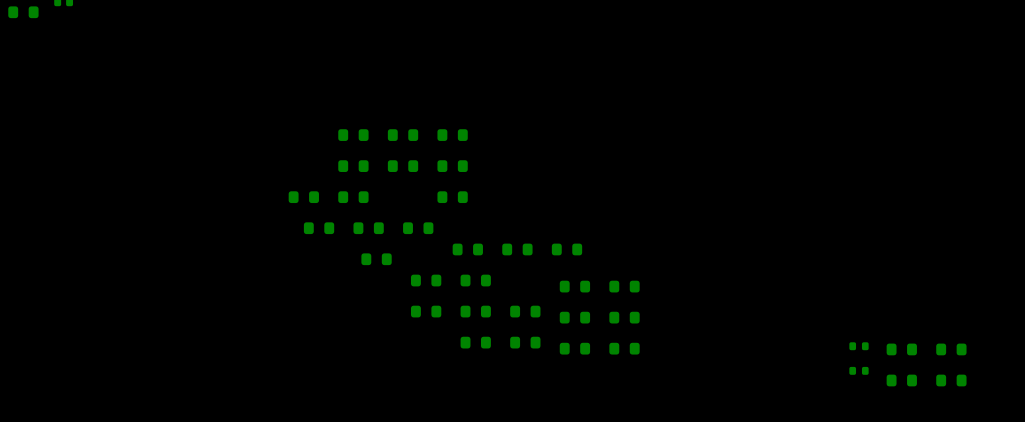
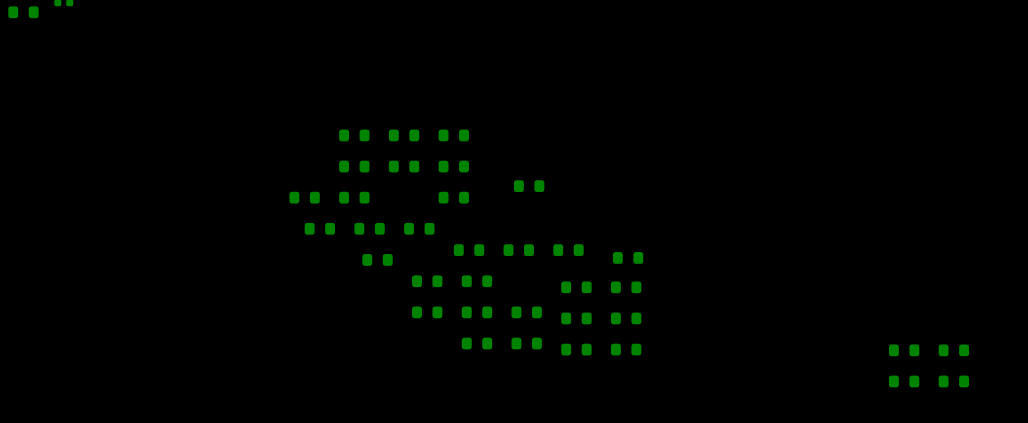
part: none -> (529, 186)
part: none -> (628, 257)
part: (859, 346) -> none
part: (859, 370) -> none

